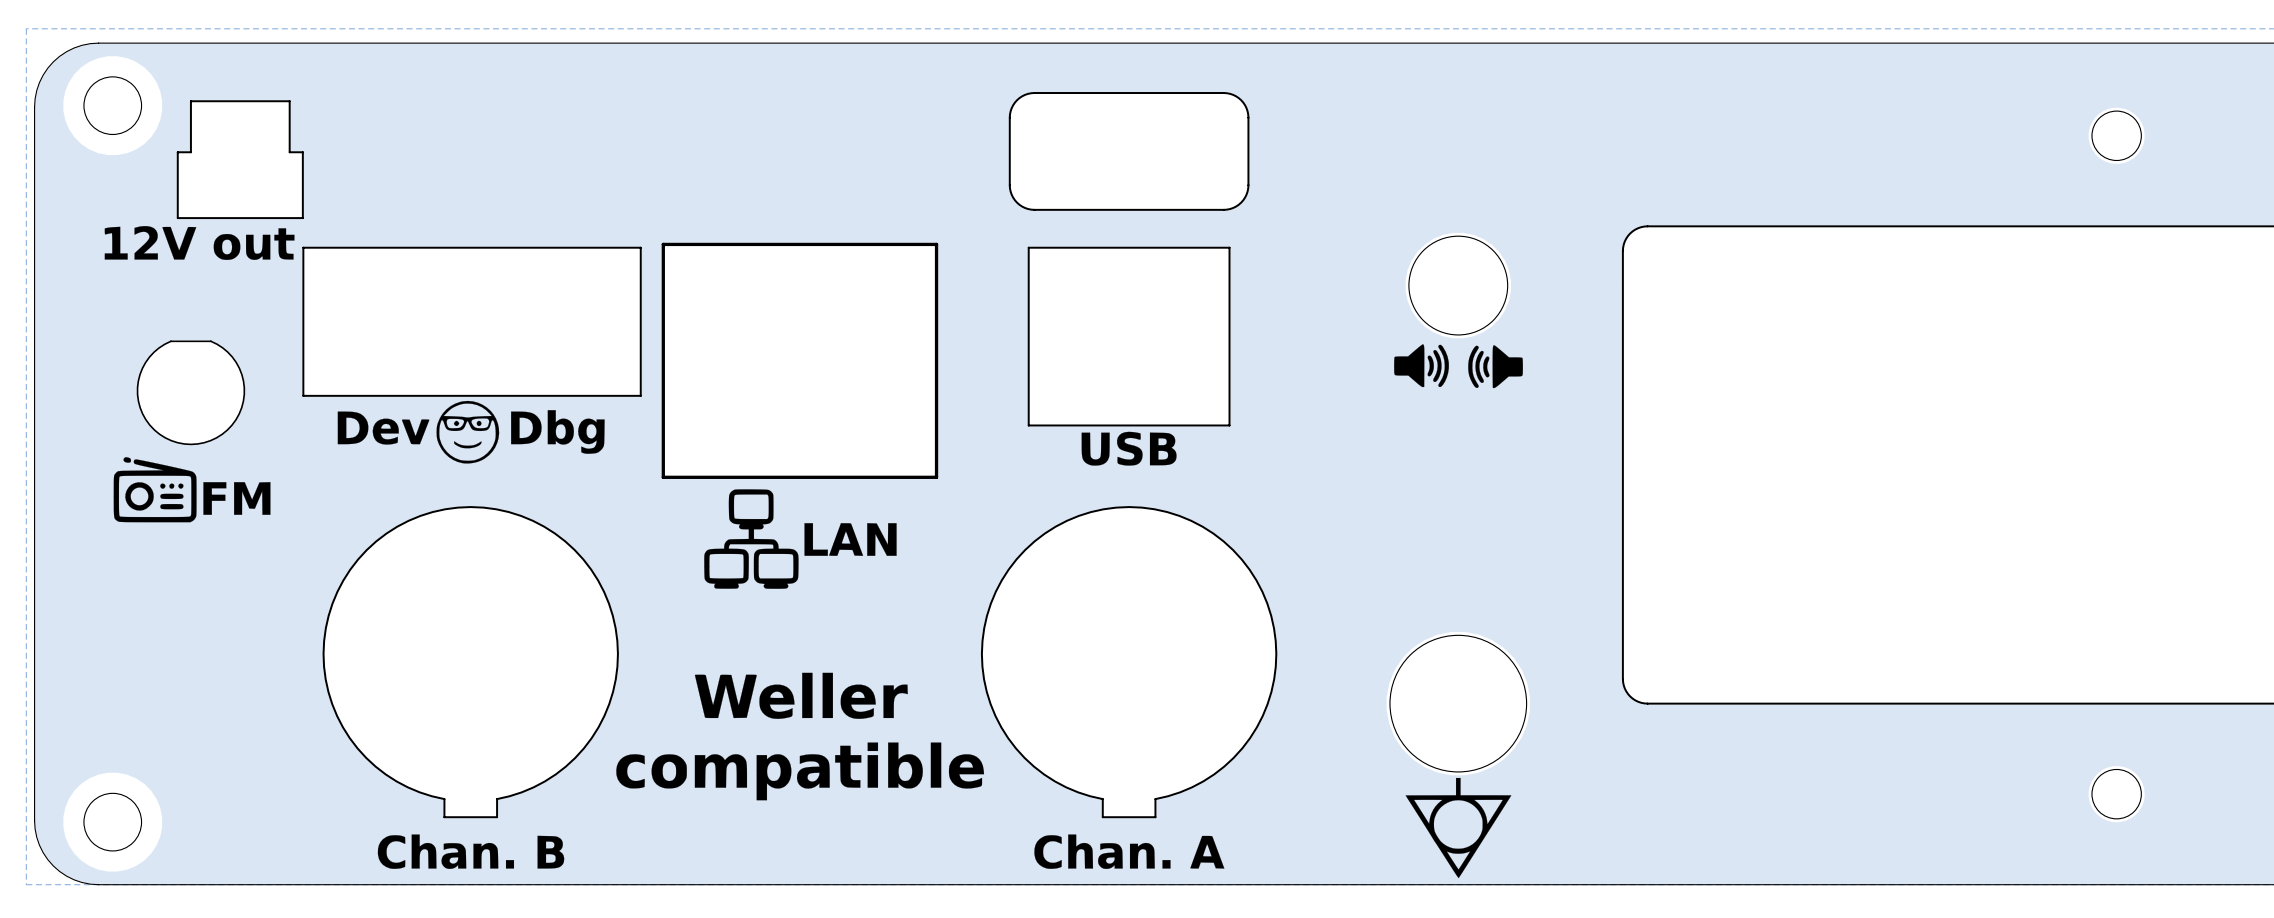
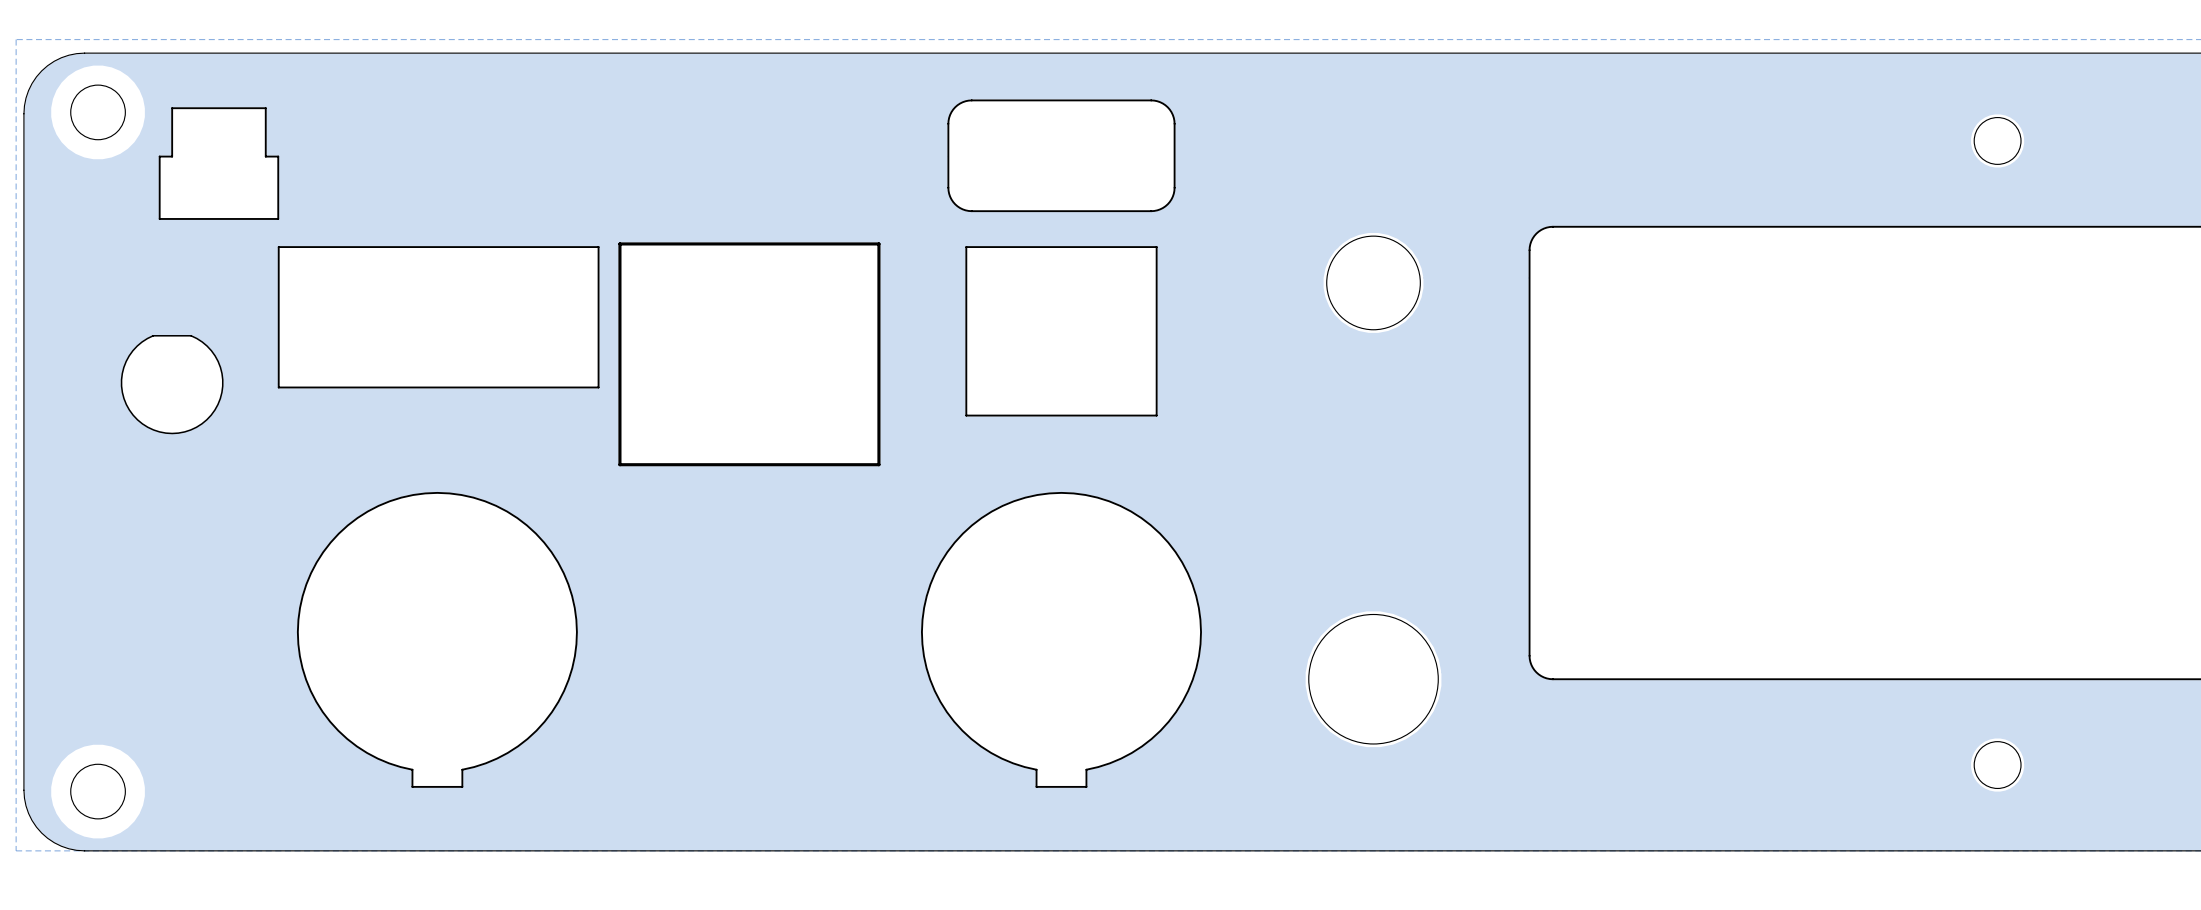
drawing: [104, 226, 295, 260] -> none
drawing: [1394, 344, 1523, 389] -> none
drawing: [337, 400, 605, 464] -> none
drawing: [1081, 431, 1177, 466] -> none
drawing: [113, 457, 271, 523] -> none
drawing: [704, 489, 897, 589] -> none
drawing: [616, 672, 985, 801] -> none
drawing: [1405, 777, 1512, 879] -> none
drawing: [377, 834, 565, 869] -> none
drawing: [1034, 834, 1225, 869] -> none

